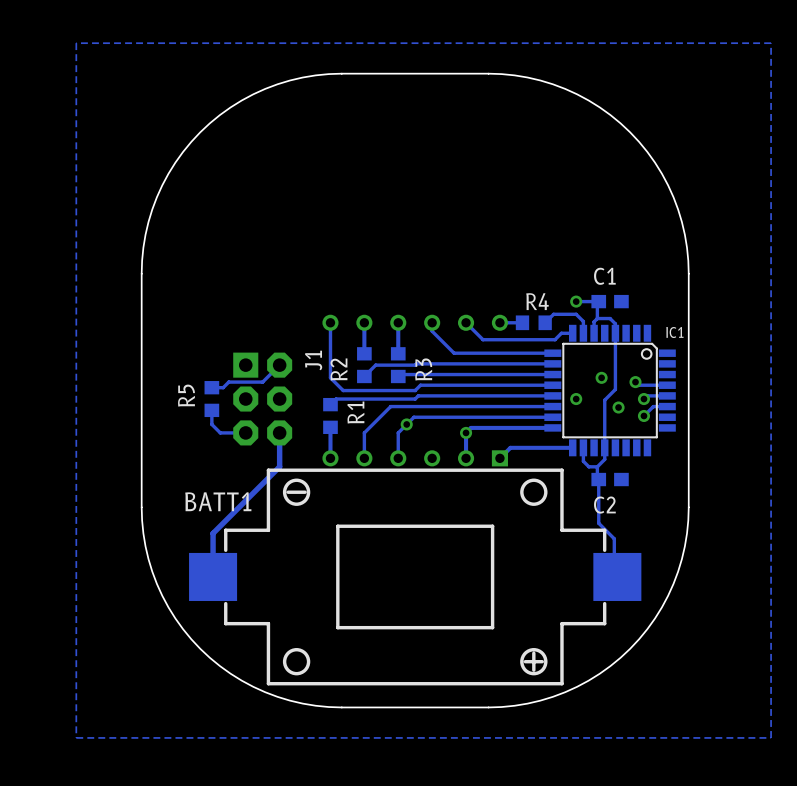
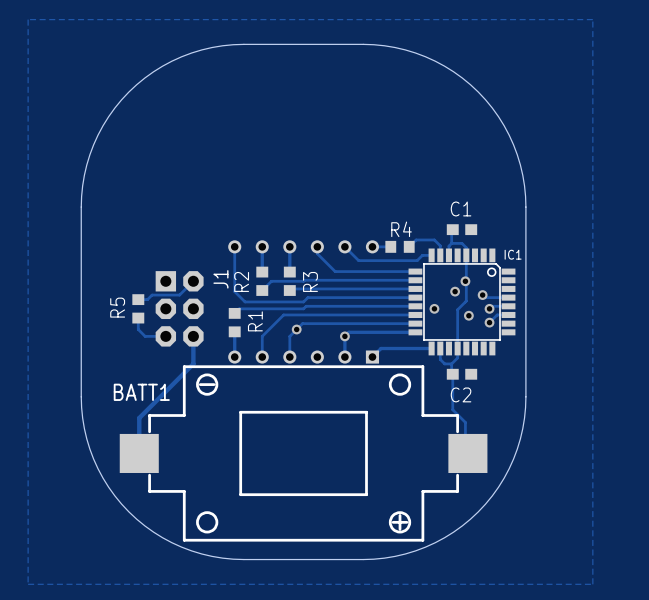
via position: (576, 301) -> (465, 281)
track: (598, 301) (576, 301) -> none

